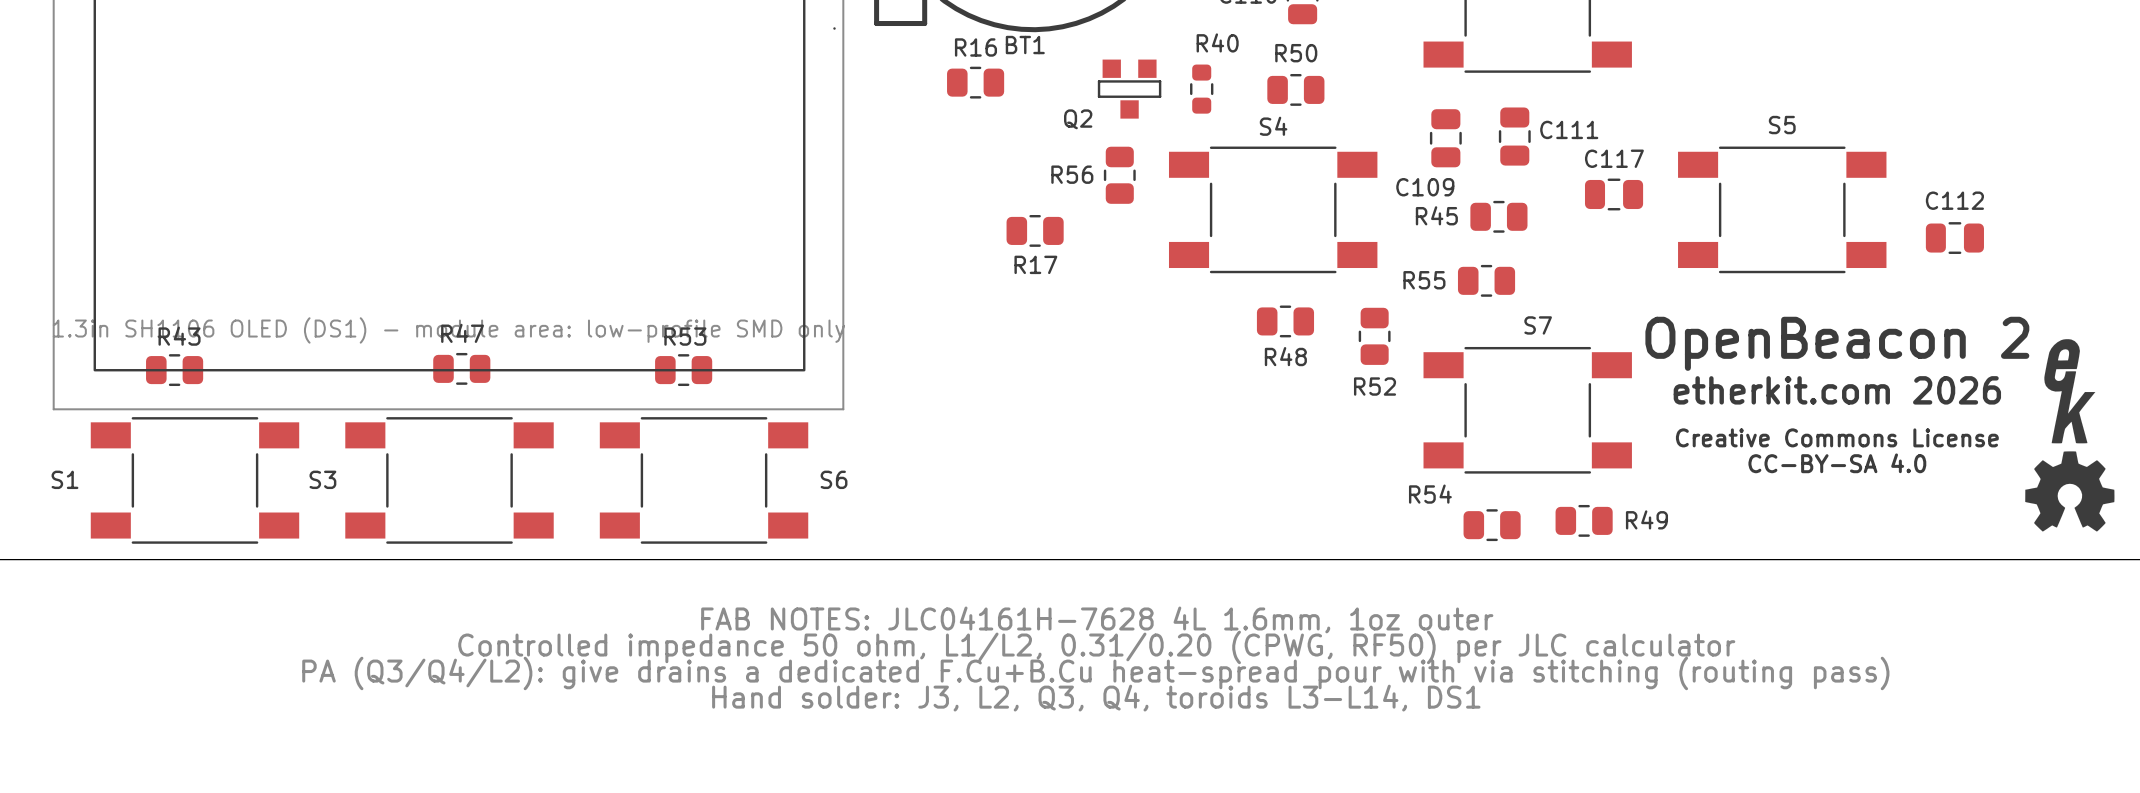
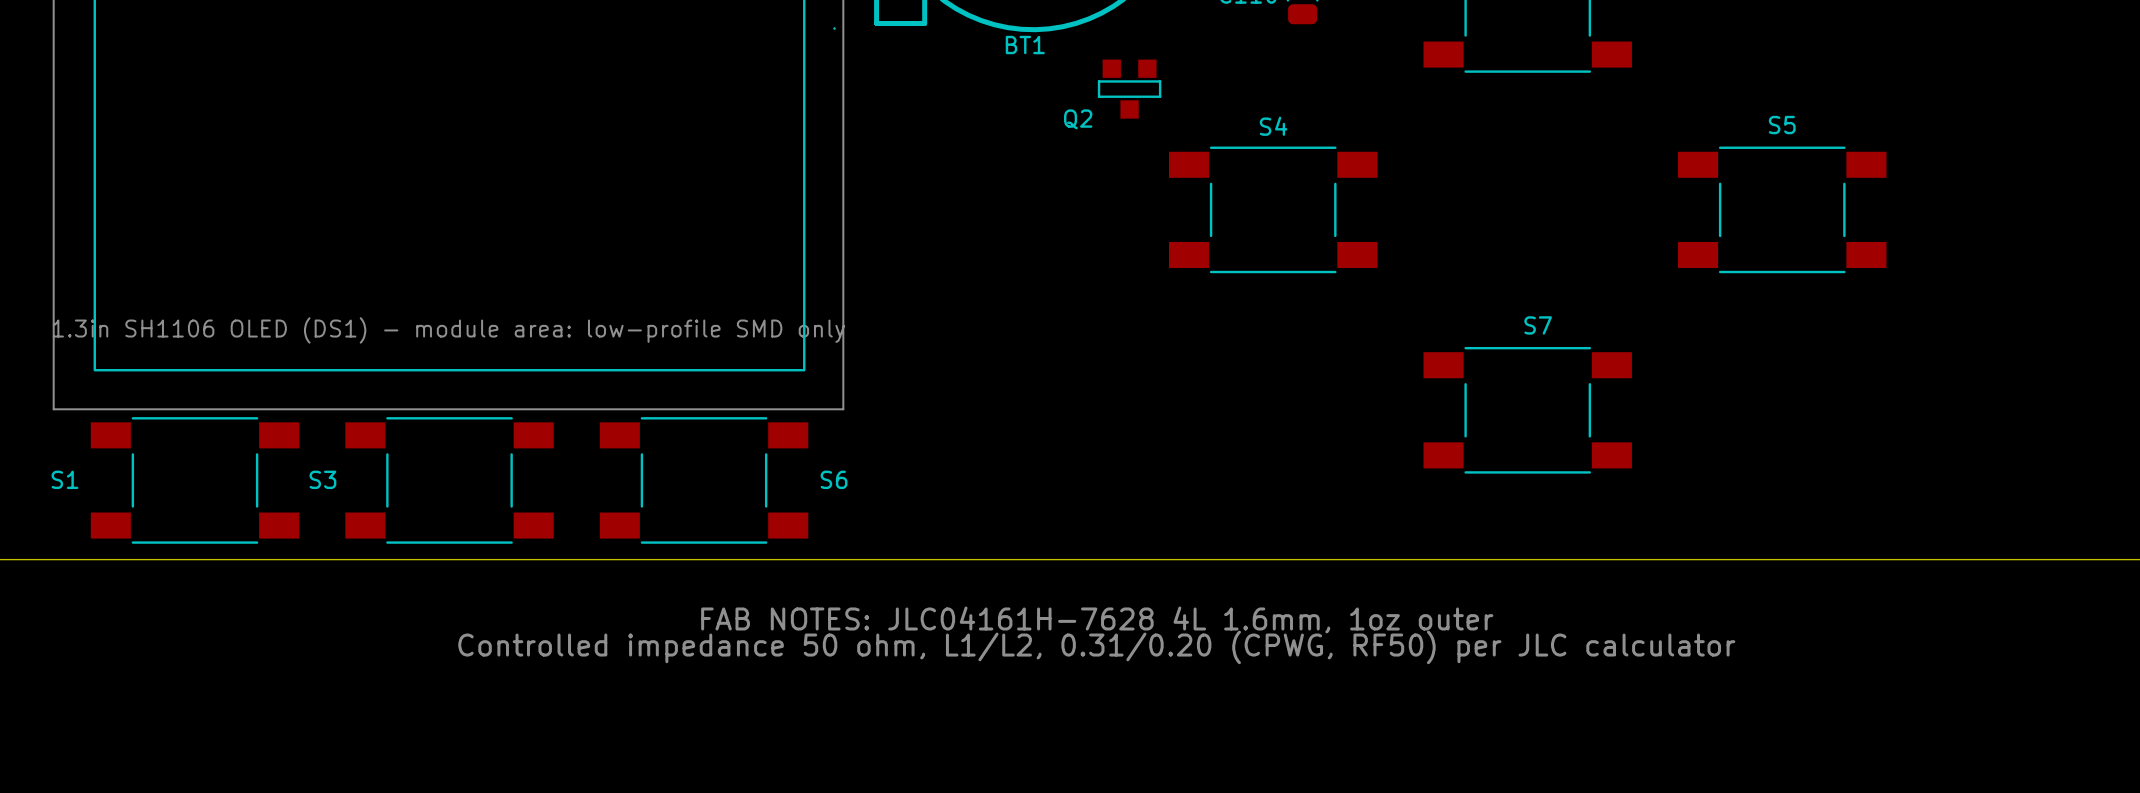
R16: (975, 82) -> none
R40: (1201, 89) -> none
R50: (1295, 89) -> none
C111: (1514, 136) -> none
C109: (1445, 138) -> none
R56: (1119, 175) -> none
C117: (1614, 194) -> none
R45: (1498, 216) -> none
R17: (1035, 230) -> none
C112: (1954, 238) -> none
R55: (1486, 280) -> none
R48: (1285, 321) -> none
R52: (1374, 336) -> none
drawing: [2025, 339, 2115, 532] -> none
text: OpenBeacon 2 (1837, 343) -> none
R47: (461, 368) -> none
R43: (174, 370) -> none
R53: (683, 370) -> none
text: etherkit.com 2026 (1837, 390) -> none
text: Creative Commons License (1837, 437) -> none
text: CC-BY-SA 4.0 (1837, 463) -> none
R49: (1584, 520) -> none
R54: (1492, 525) -> none
text: PA (Q3/Q4/L2): give drains a dedicated F.Cu+B.Cu heat-spread pour with via stitching (routing pass) (1095, 673) -> none
text: Hand solder: J3, L2, Q3, Q4, toroids L3-L14, DS1 (1096, 698) -> none

